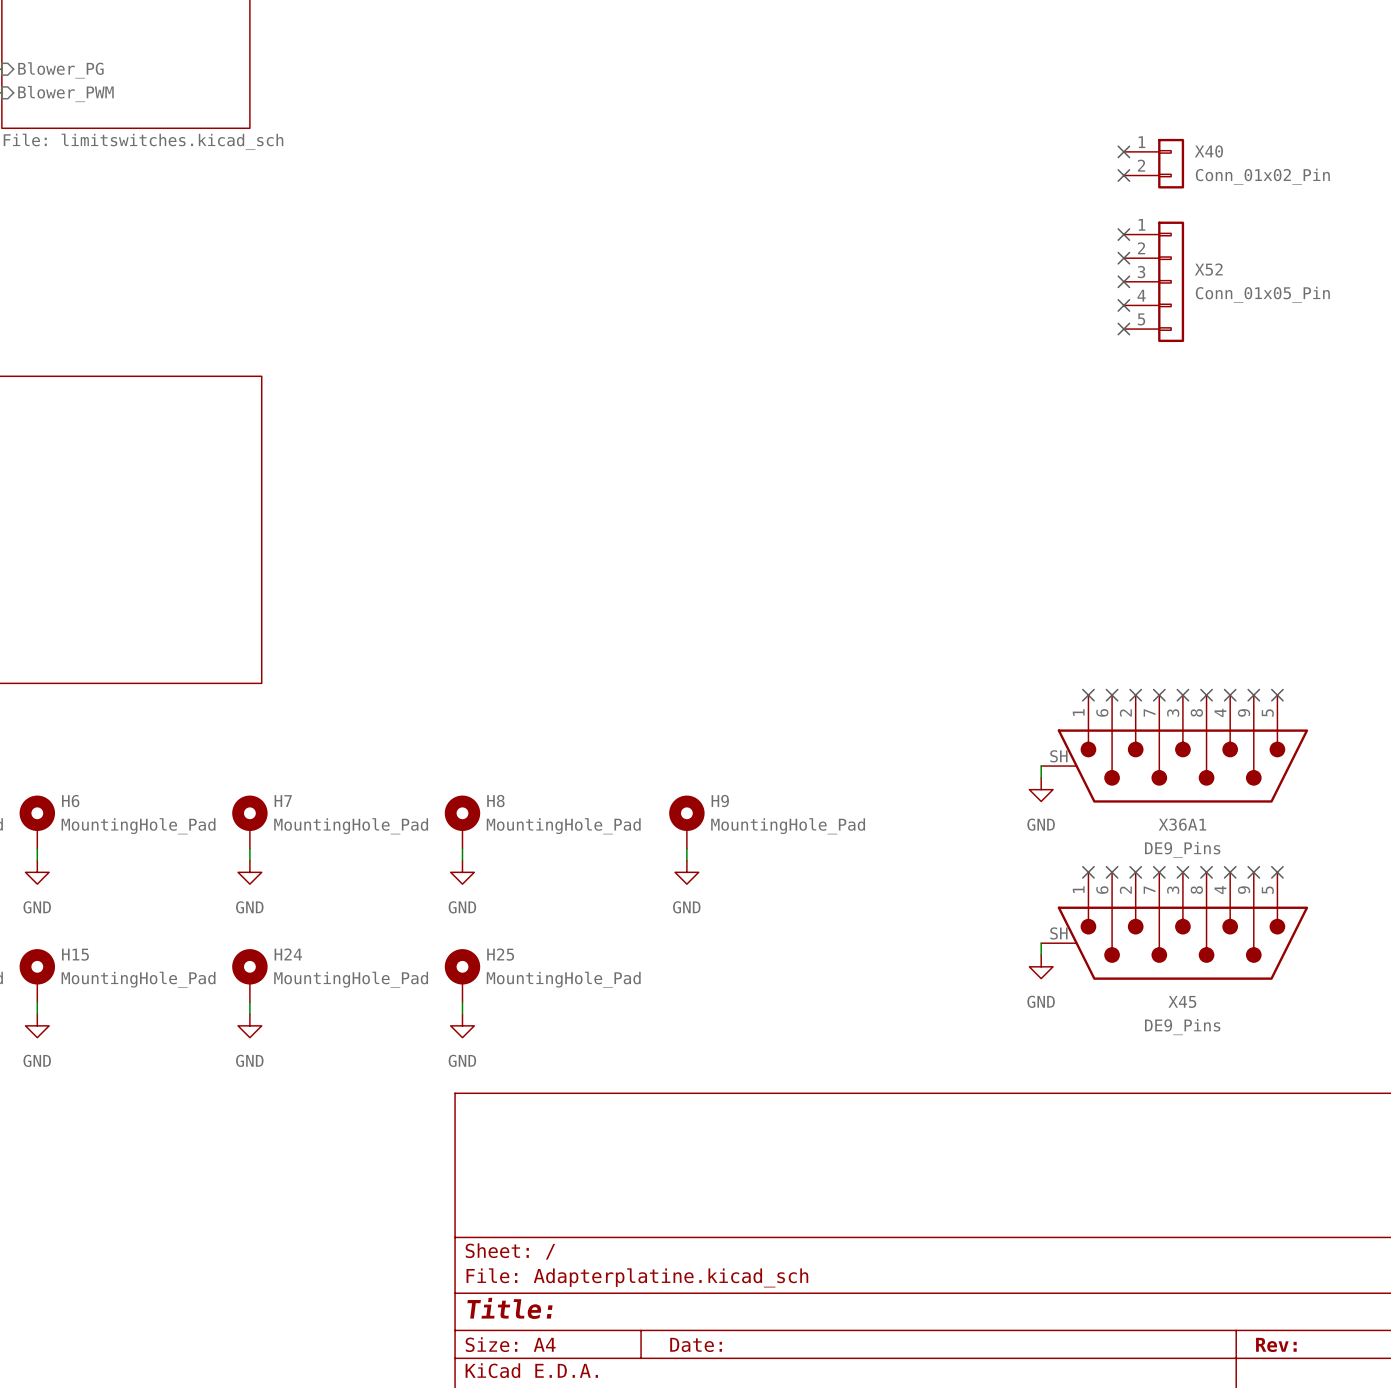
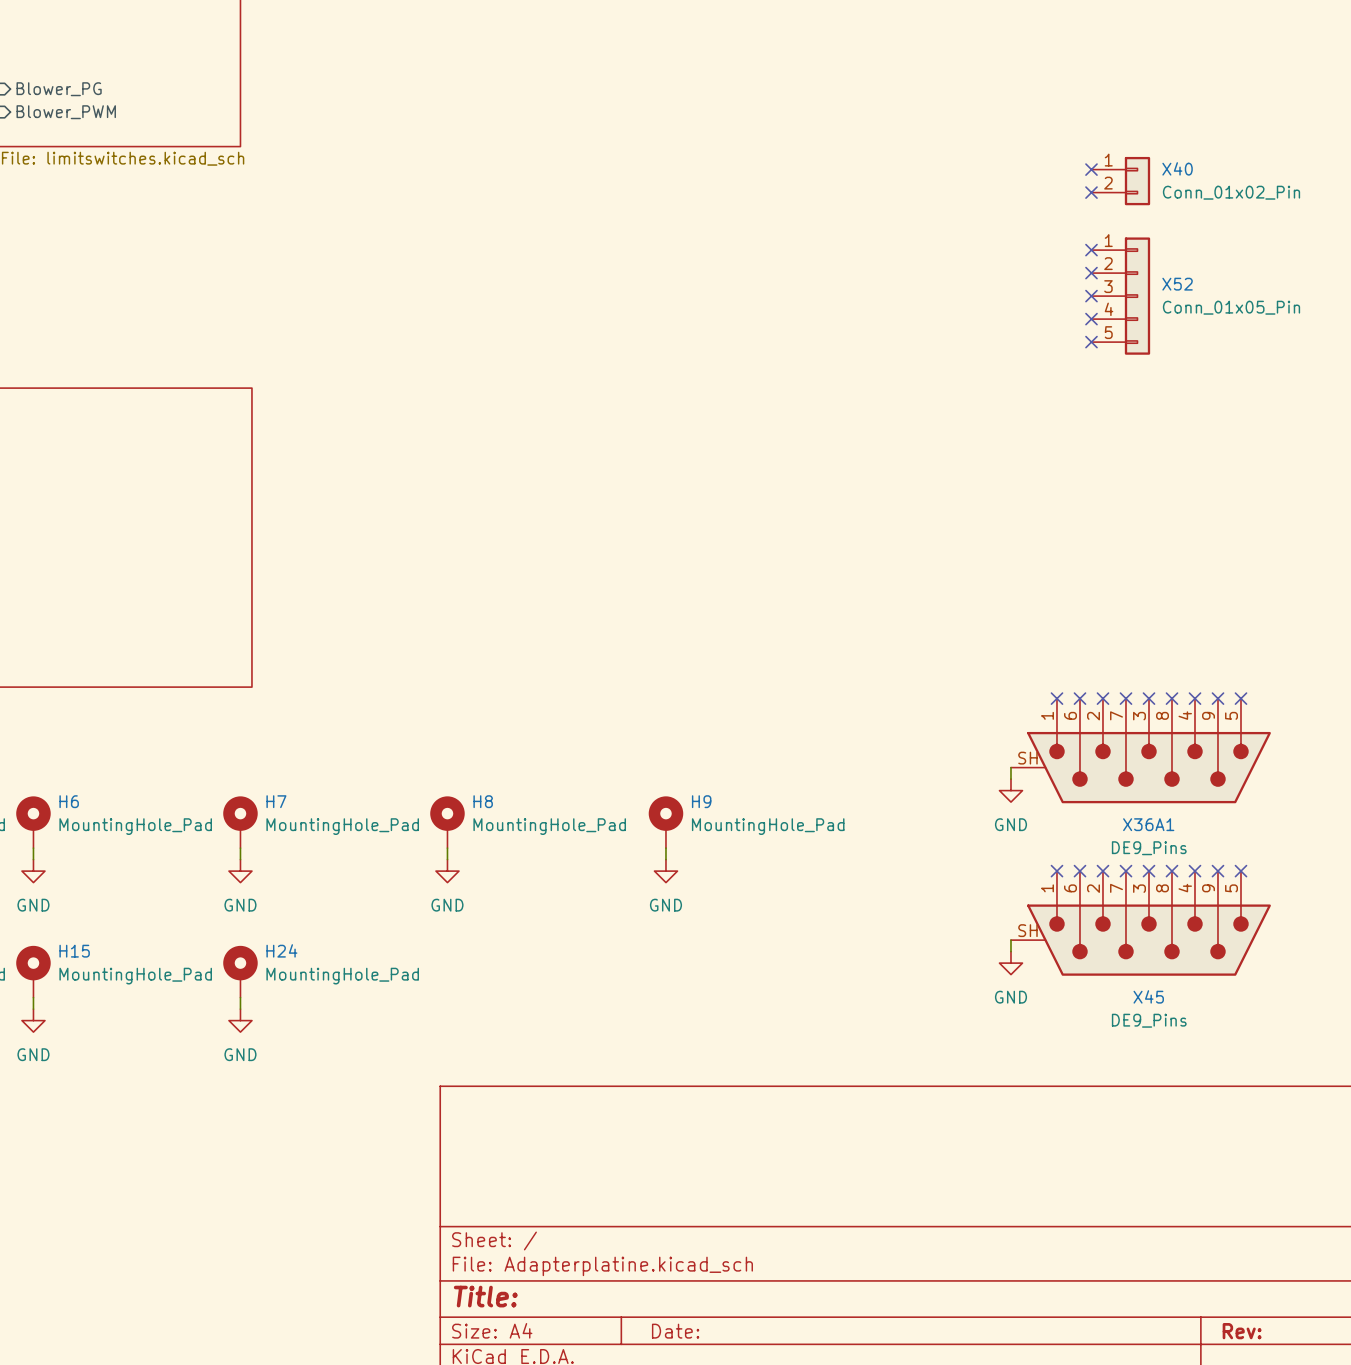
H25: MountingHole_Pad (462, 975) -> none
wire: (462, 1002) (462, 1014) -> none
power symbol: GND (462, 1025) -> none

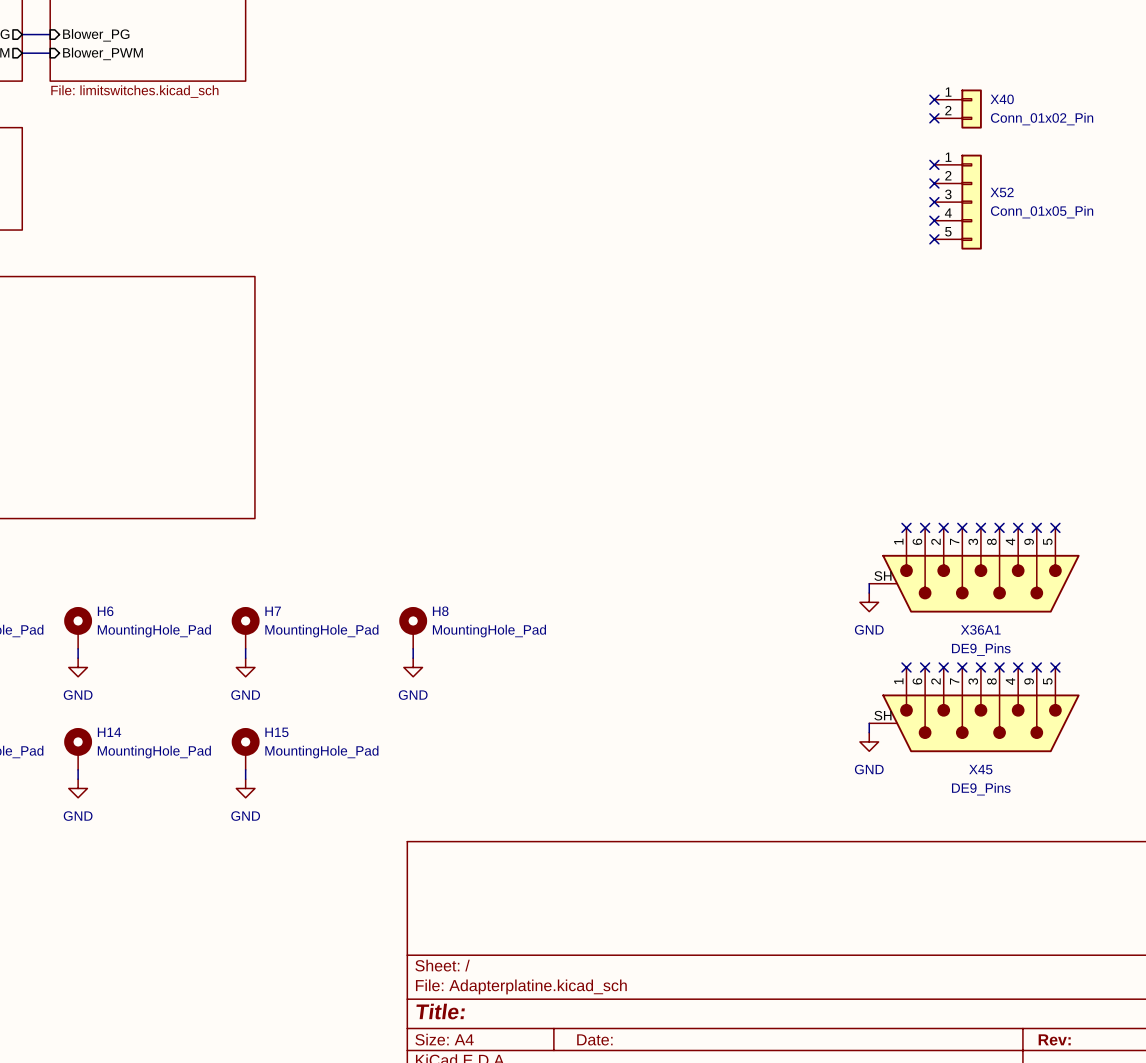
H9: MountingHole_Pad (665, 822) -> none
wire: (665, 848) (665, 859) -> none
power symbol: GND (665, 871) -> none
H24 name: H24 (281, 950) -> H15 (276, 732)
H15 name: H15 (74, 951) -> H14 (109, 732)

